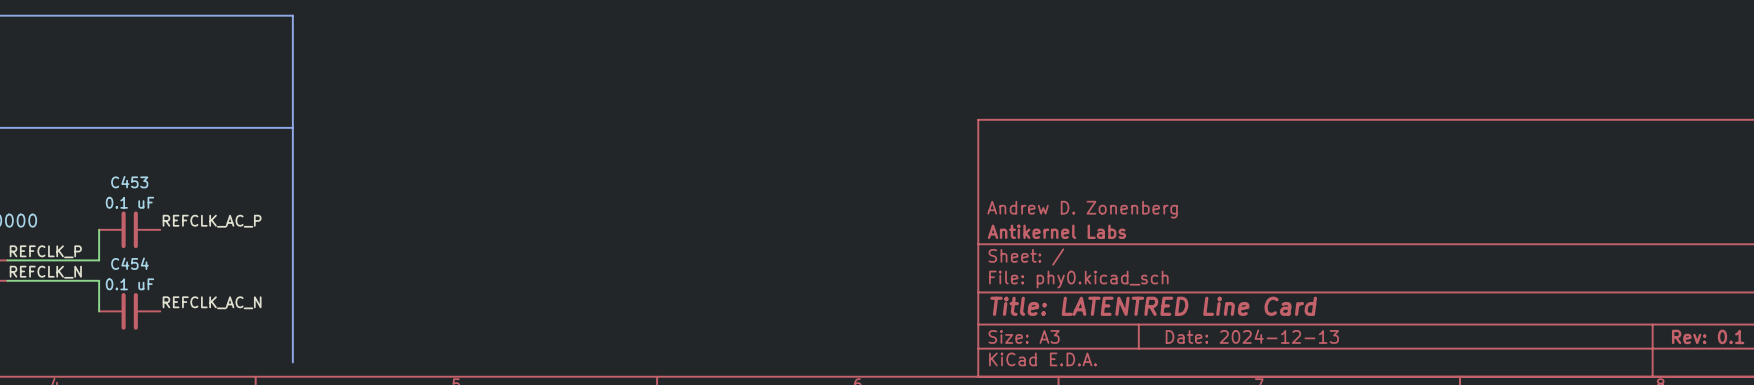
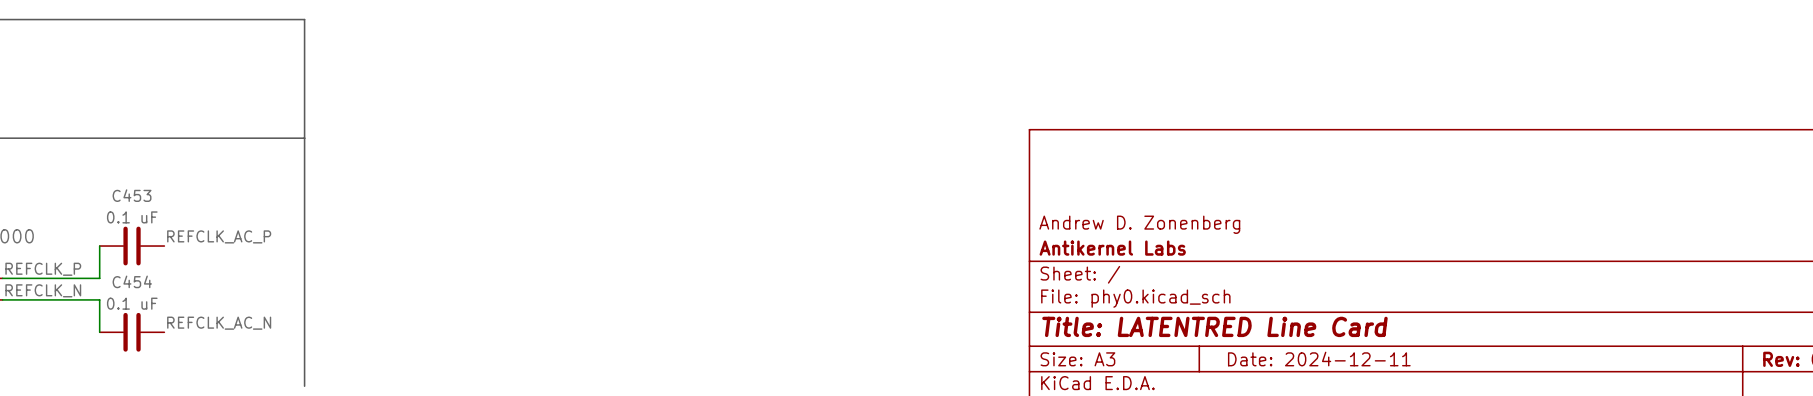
title block: Date: 2024-12-13 (1252, 336) -> Date: 2024-12-11 (1319, 359)

